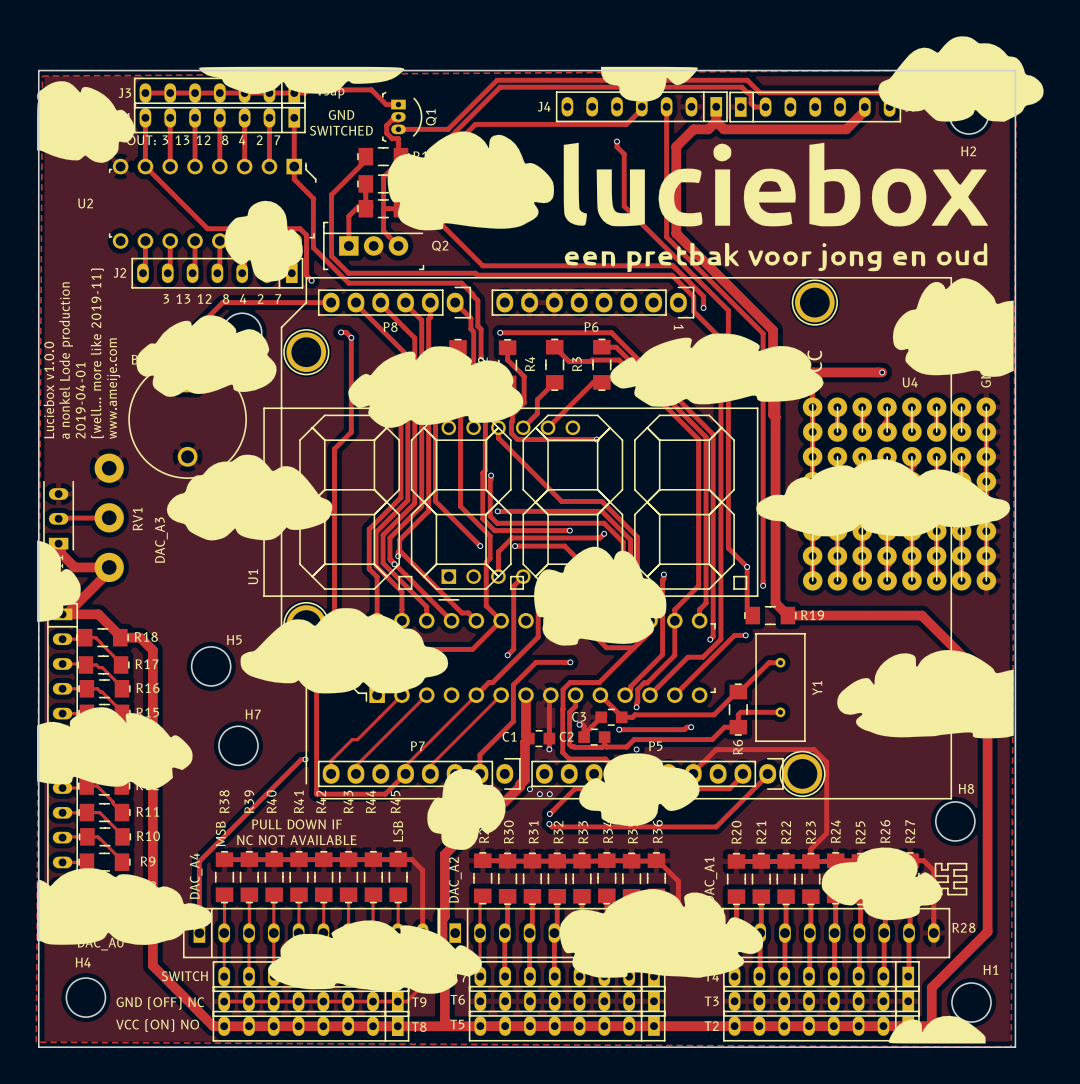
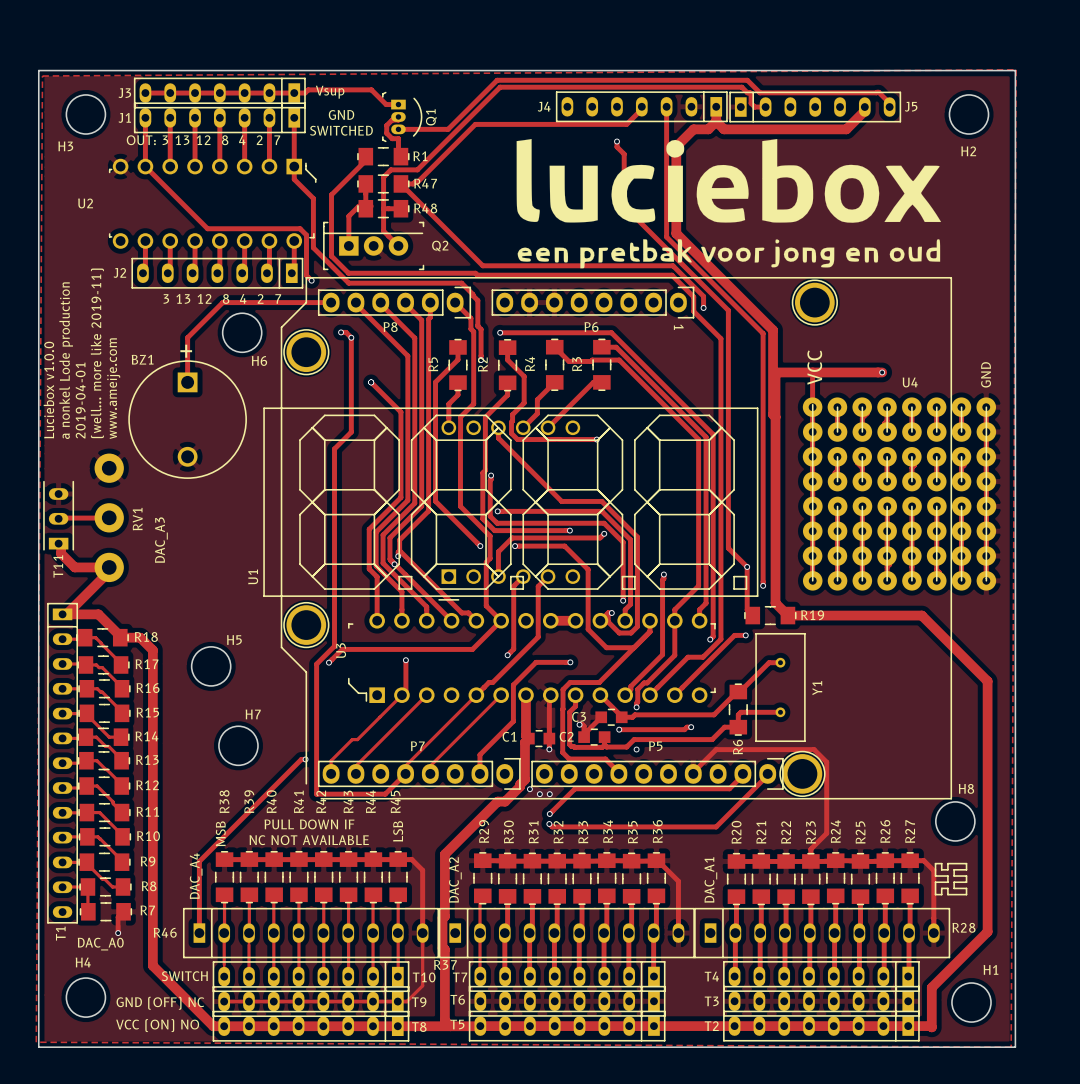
drawing: [37, 36, 1044, 1044] -> none
drawing position: (776, 207) -> (728, 203)
text position: PULL DOWN IF (297, 824) -> PULL DOWN IF (309, 824)
text position: NC NOT AVAILABLE (296, 840) -> NC NOT AVAILABLE (309, 840)

